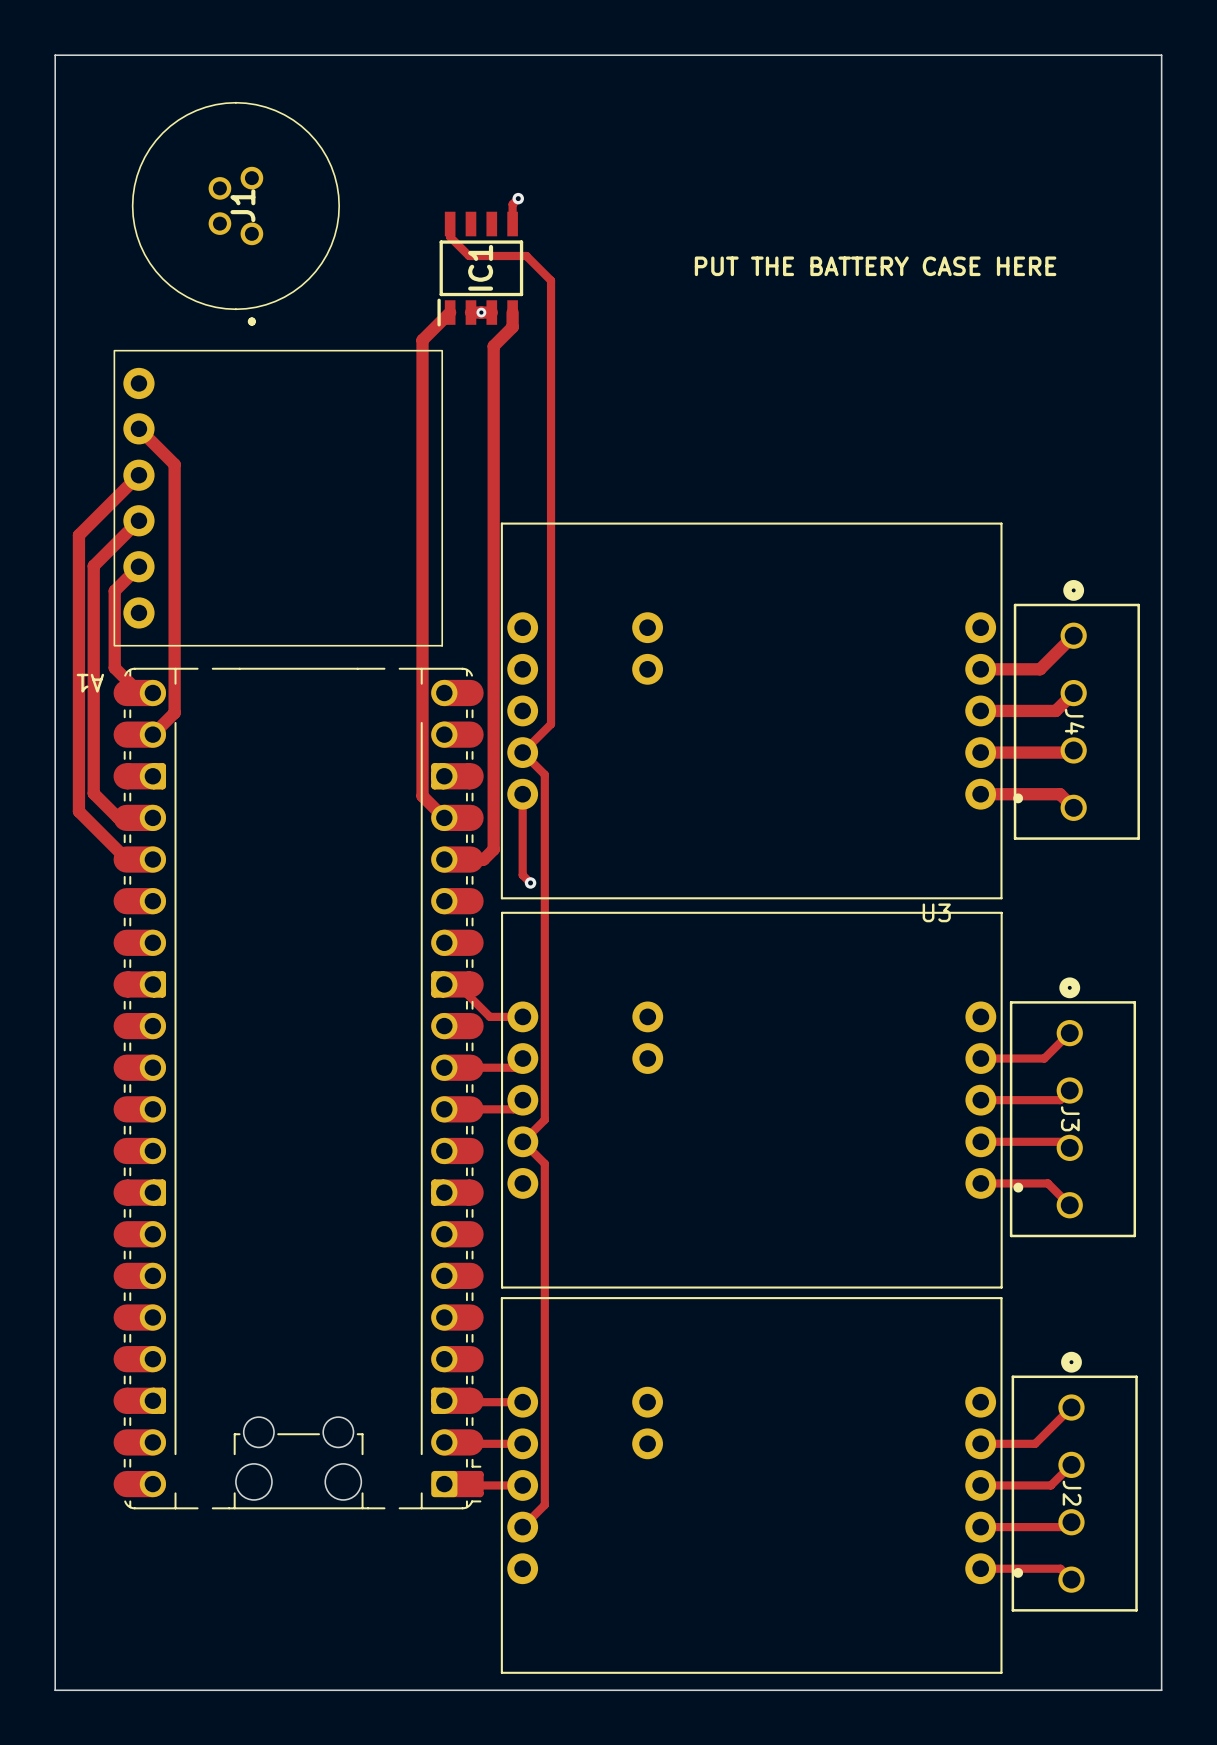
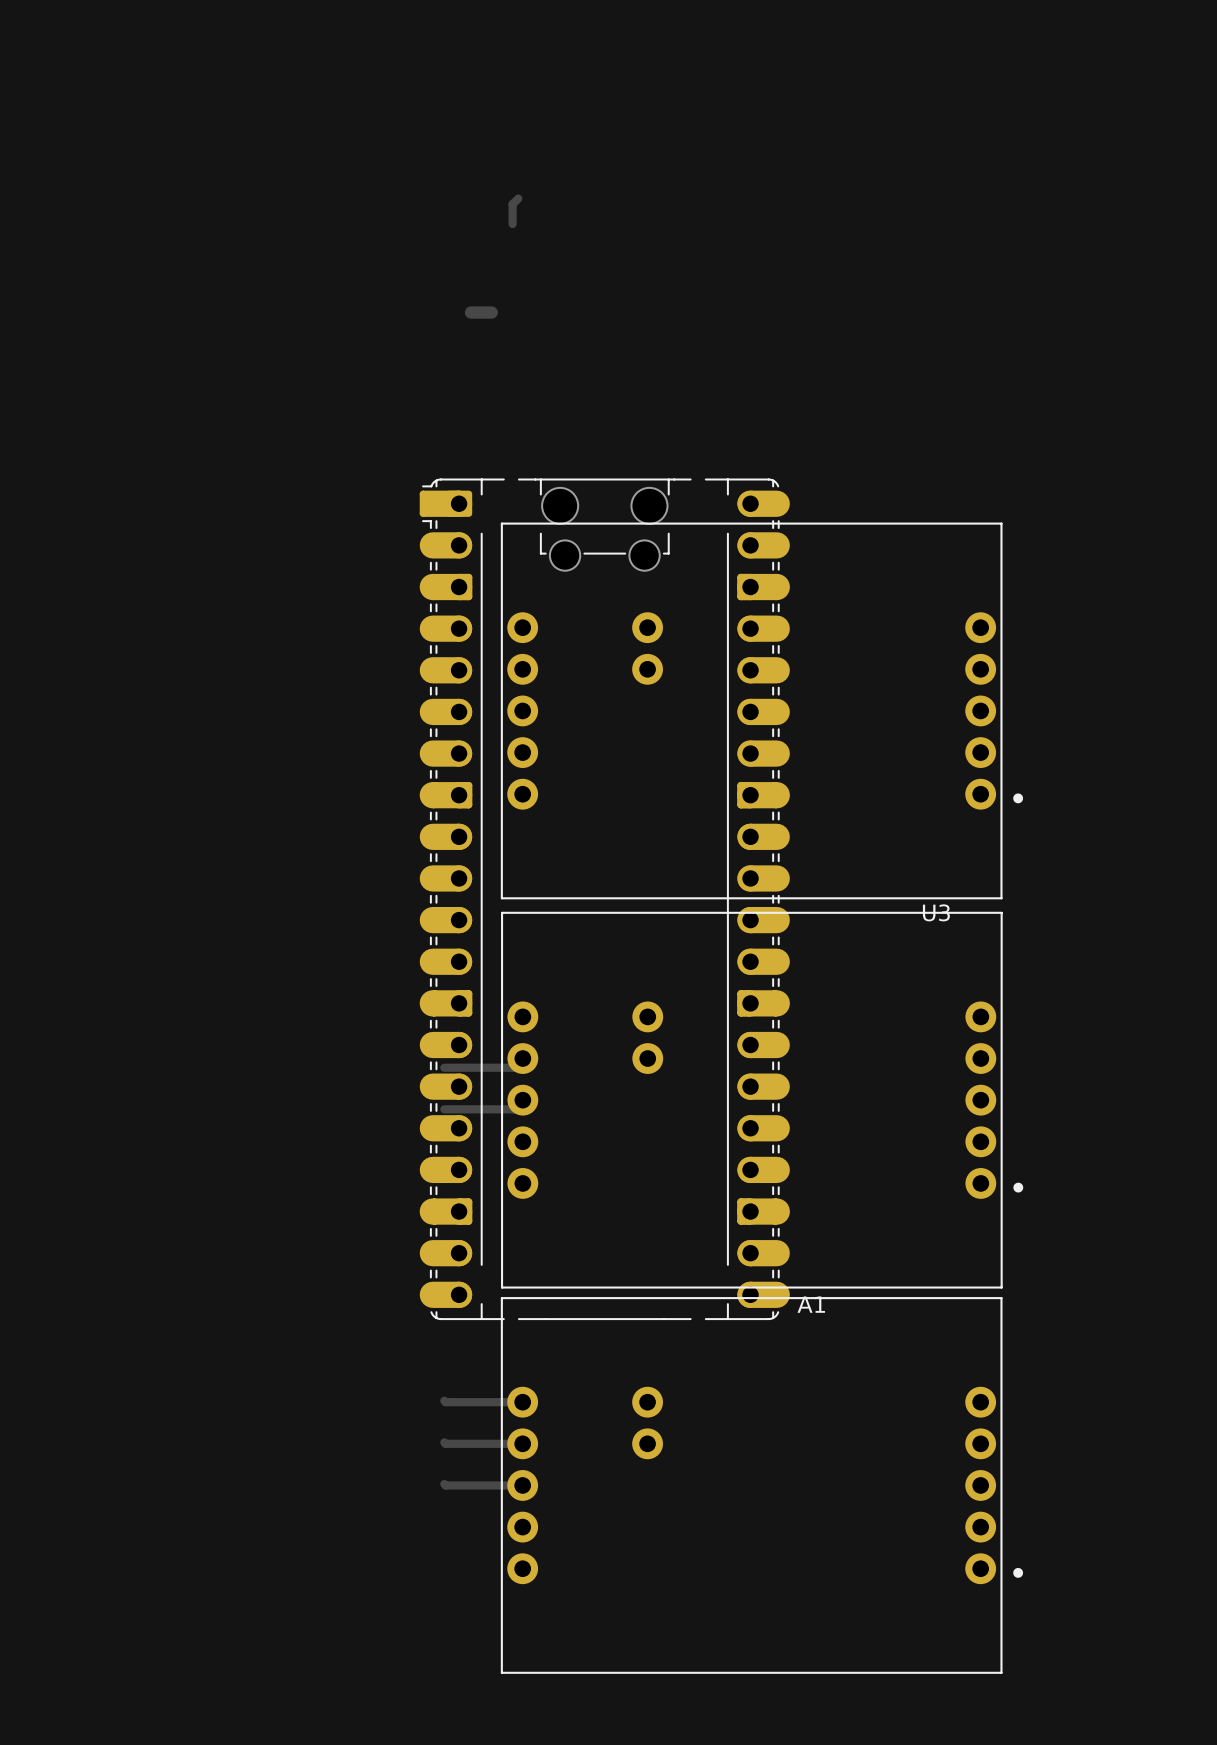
board edge: (55, 55) (1161, 55) (1161, 1690) (55, 1690) (55, 55) -> none
via: (518, 198) -> none
J1: (235, 213) -> none
track: (450, 224) (450, 237) (469, 255) (526, 255) (551, 280) (551, 724) (522, 752) (544, 774) (544, 1119) (522, 1141) (544, 1163) (544, 1504) (522, 1527) -> none
text: PUT THE BATTERY CASE HERE (875, 266) -> none
IC1: (480, 269) -> none
track: (450, 312) (422, 340) (422, 796) (444, 817) -> none
via: (481, 312) -> none
track: (512, 312) (512, 327) (493, 346) (493, 849) (483, 859) (457, 859) -> none
track: (138, 428) (174, 464) (174, 712) (152, 734) -> none
track: (138, 475) (78, 535) (78, 811) (126, 859) (139, 859) -> none
part: (278, 498) -> none
track: (138, 520) (93, 566) (93, 793) (118, 817) (139, 817) -> none
track: (138, 566) (114, 590) (114, 667) (139, 693) -> none
track: (1073, 635) (1040, 669) (980, 669) -> none
track: (1073, 693) (1055, 710) (980, 710) -> none
J4: (1076, 709) -> none
track: (980, 752) (1071, 752) -> none
track: (522, 794) (522, 875) (530, 882) -> none
track: (980, 794) (1060, 794) (1073, 807) -> none
via: (530, 882) -> none
track: (444, 984) (457, 984) (489, 1016) (522, 1016) -> none
track: (1069, 1033) (1044, 1058) (980, 1058) -> none
A1 rotation: 0° (298, 1088) -> 180° (604, 899)
track: (1069, 1090) (1060, 1100) (980, 1100) -> none
J3: (1072, 1107) -> none
track: (980, 1141) (1063, 1141) (1069, 1147) -> none
track: (980, 1183) (1047, 1183) (1069, 1205) -> none
track: (1071, 1407) (1035, 1443) (980, 1443) -> none
track: (1071, 1464) (1050, 1485) (980, 1485) -> none
J2: (1074, 1481) -> none
track: (1071, 1522) (1066, 1527) (980, 1527) -> none
track: (980, 1568) (1060, 1568) (1071, 1579) -> none

